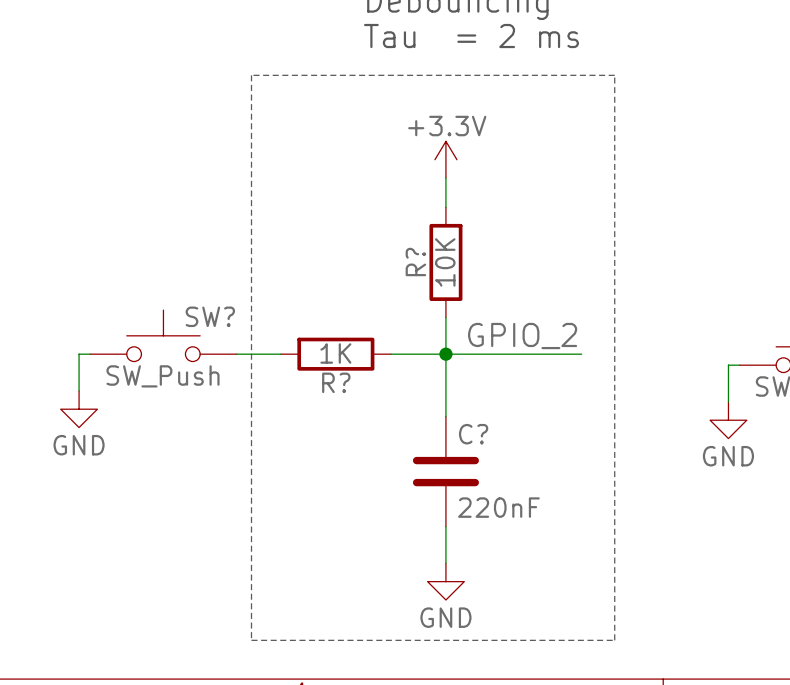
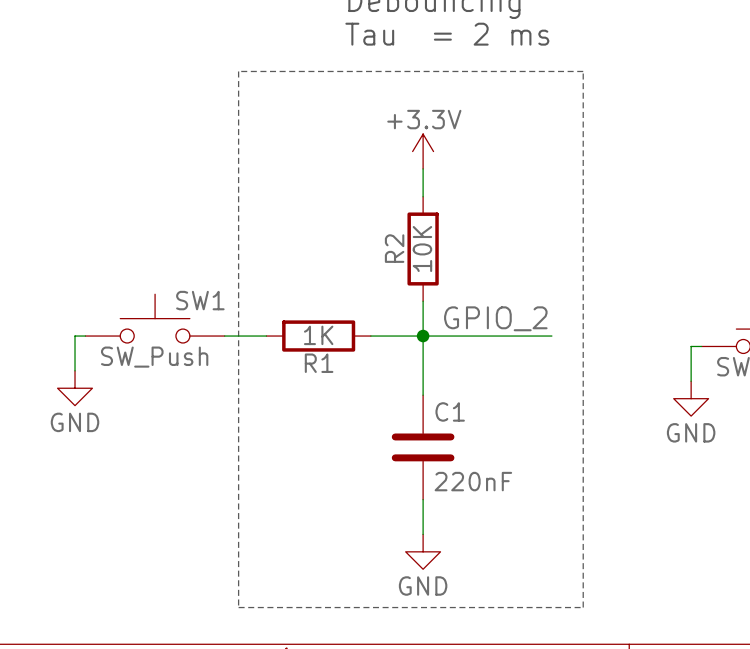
R? name: R? (415, 262) -> R2 (394, 248)
SW? name: SW? (210, 316) -> SW1 (200, 300)
R? name: R? (336, 382) -> R1 (319, 363)
C? name: C? (473, 434) -> C1 (450, 411)

